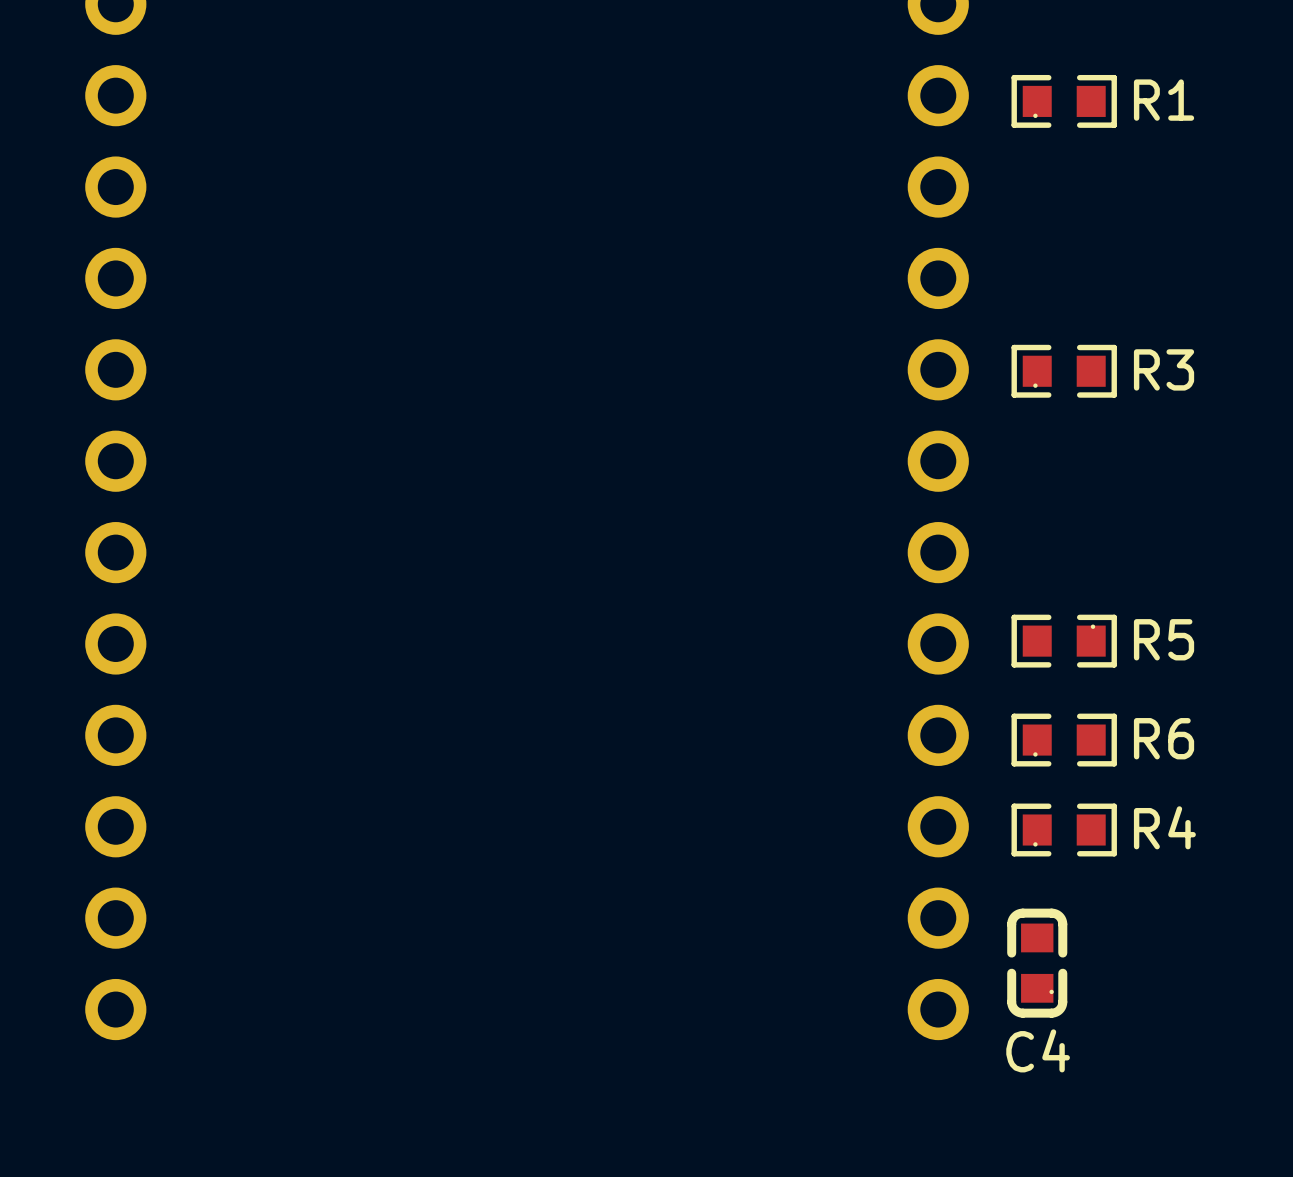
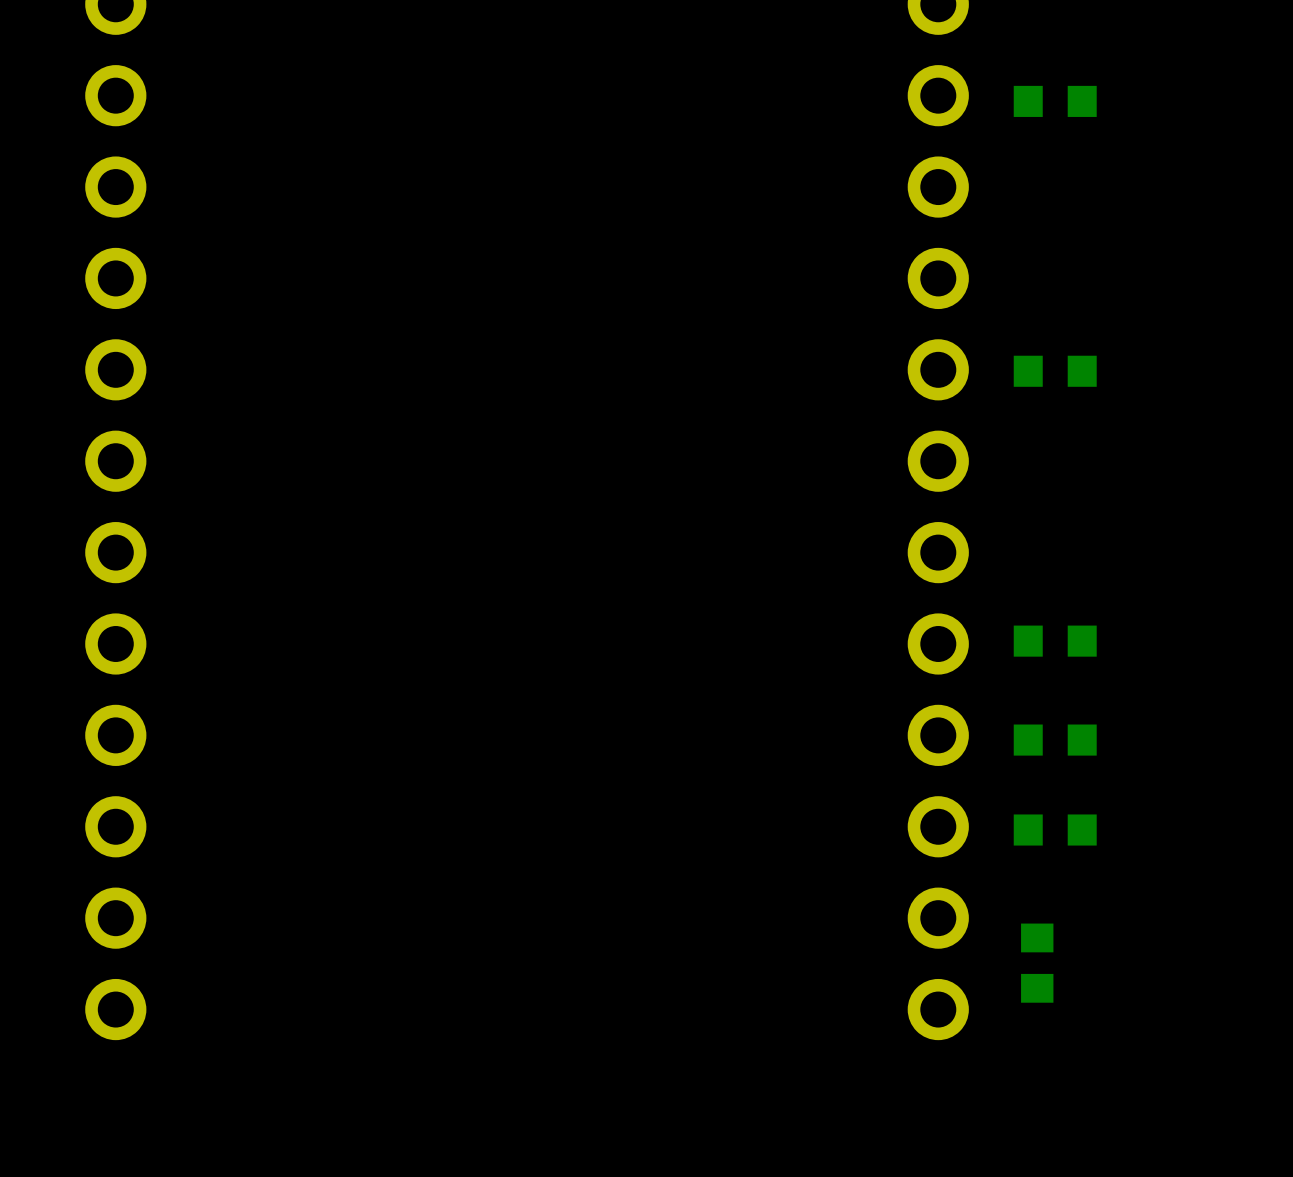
R1 side: top (1064, 101) -> bottom (1055, 101)
R3 side: top (1064, 371) -> bottom (1055, 371)
R5 side: top (1064, 641) -> bottom (1055, 641)
R6 side: top (1064, 740) -> bottom (1055, 740)
R4 side: top (1064, 830) -> bottom (1055, 830)
C4 side: top (1037, 963) -> bottom (1037, 963)

